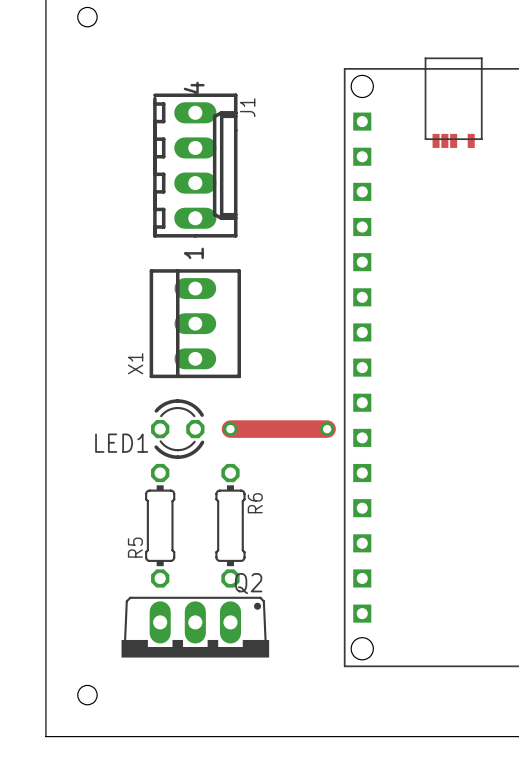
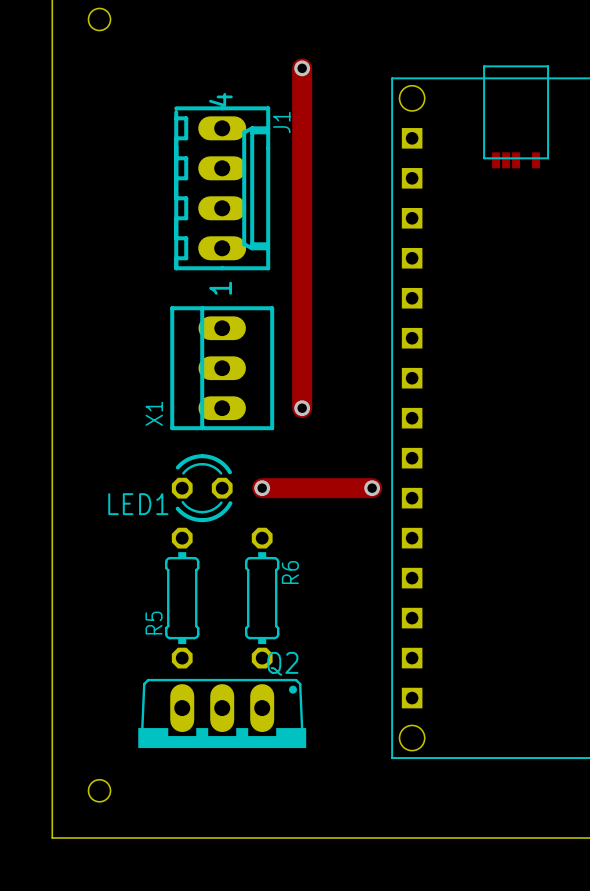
track: none -> (302, 68) (302, 408)
via: none -> (302, 68)
via: none -> (302, 408)

